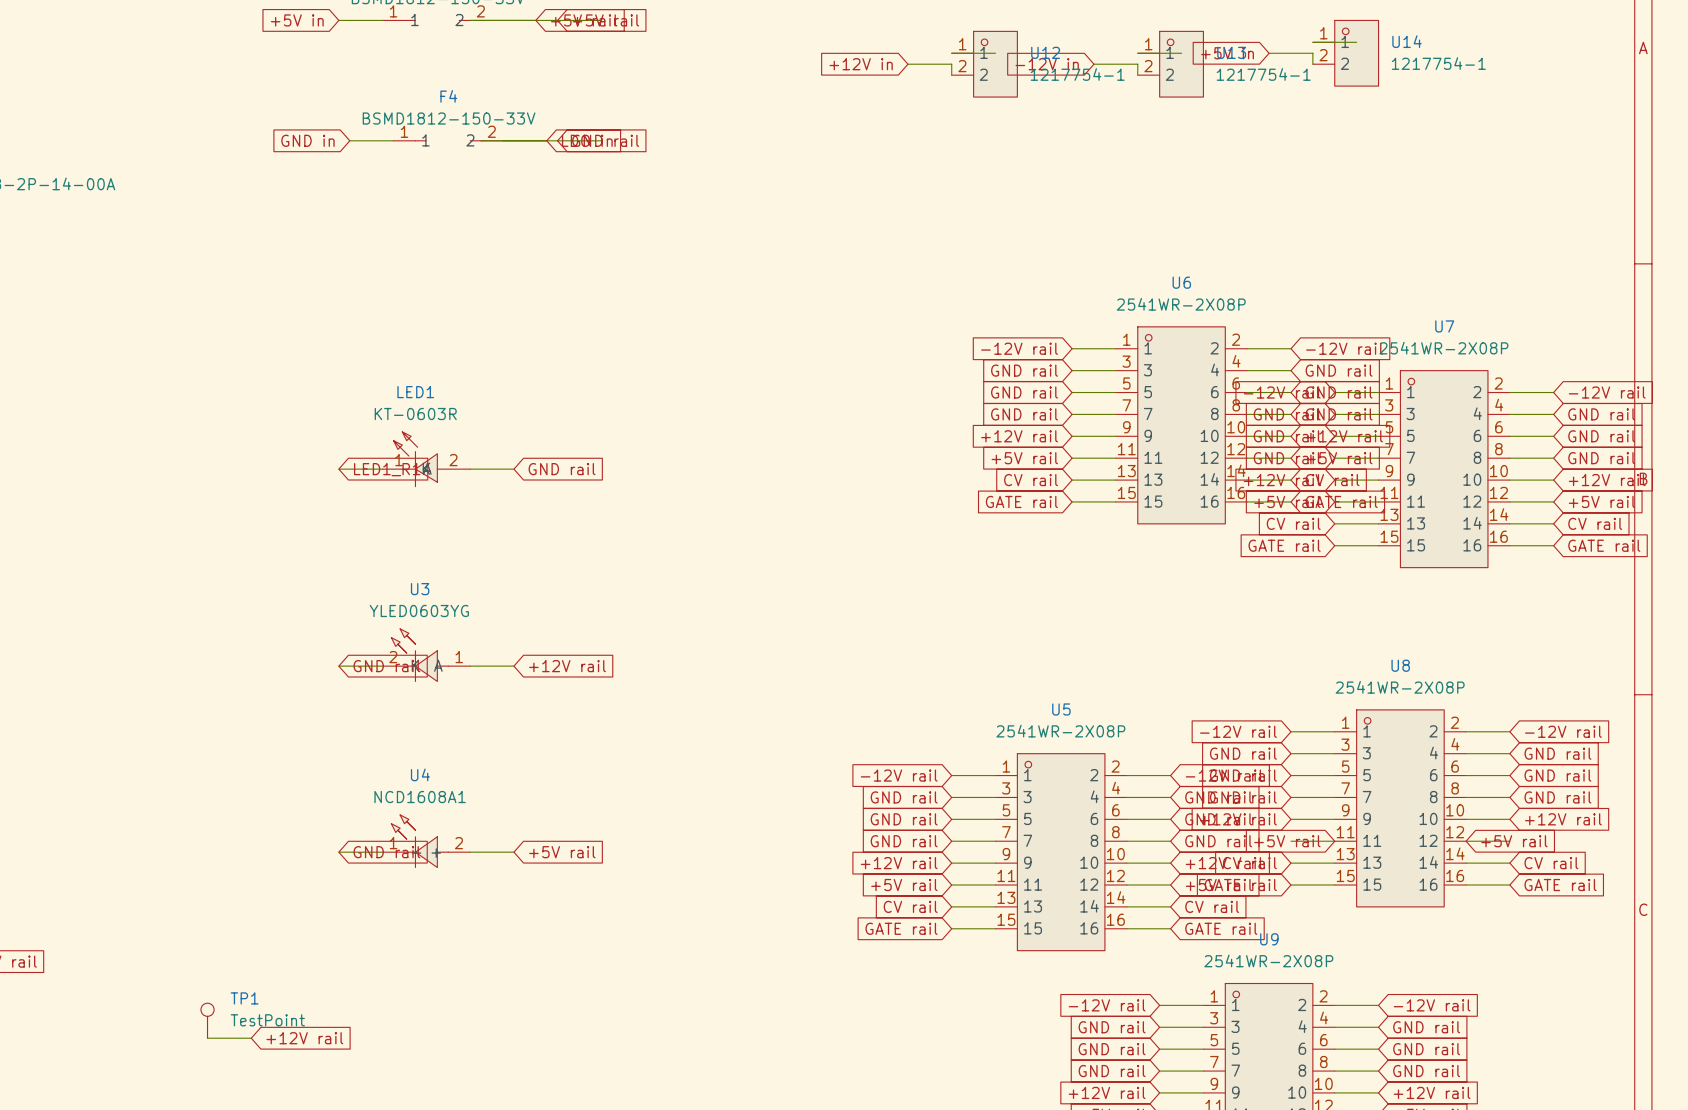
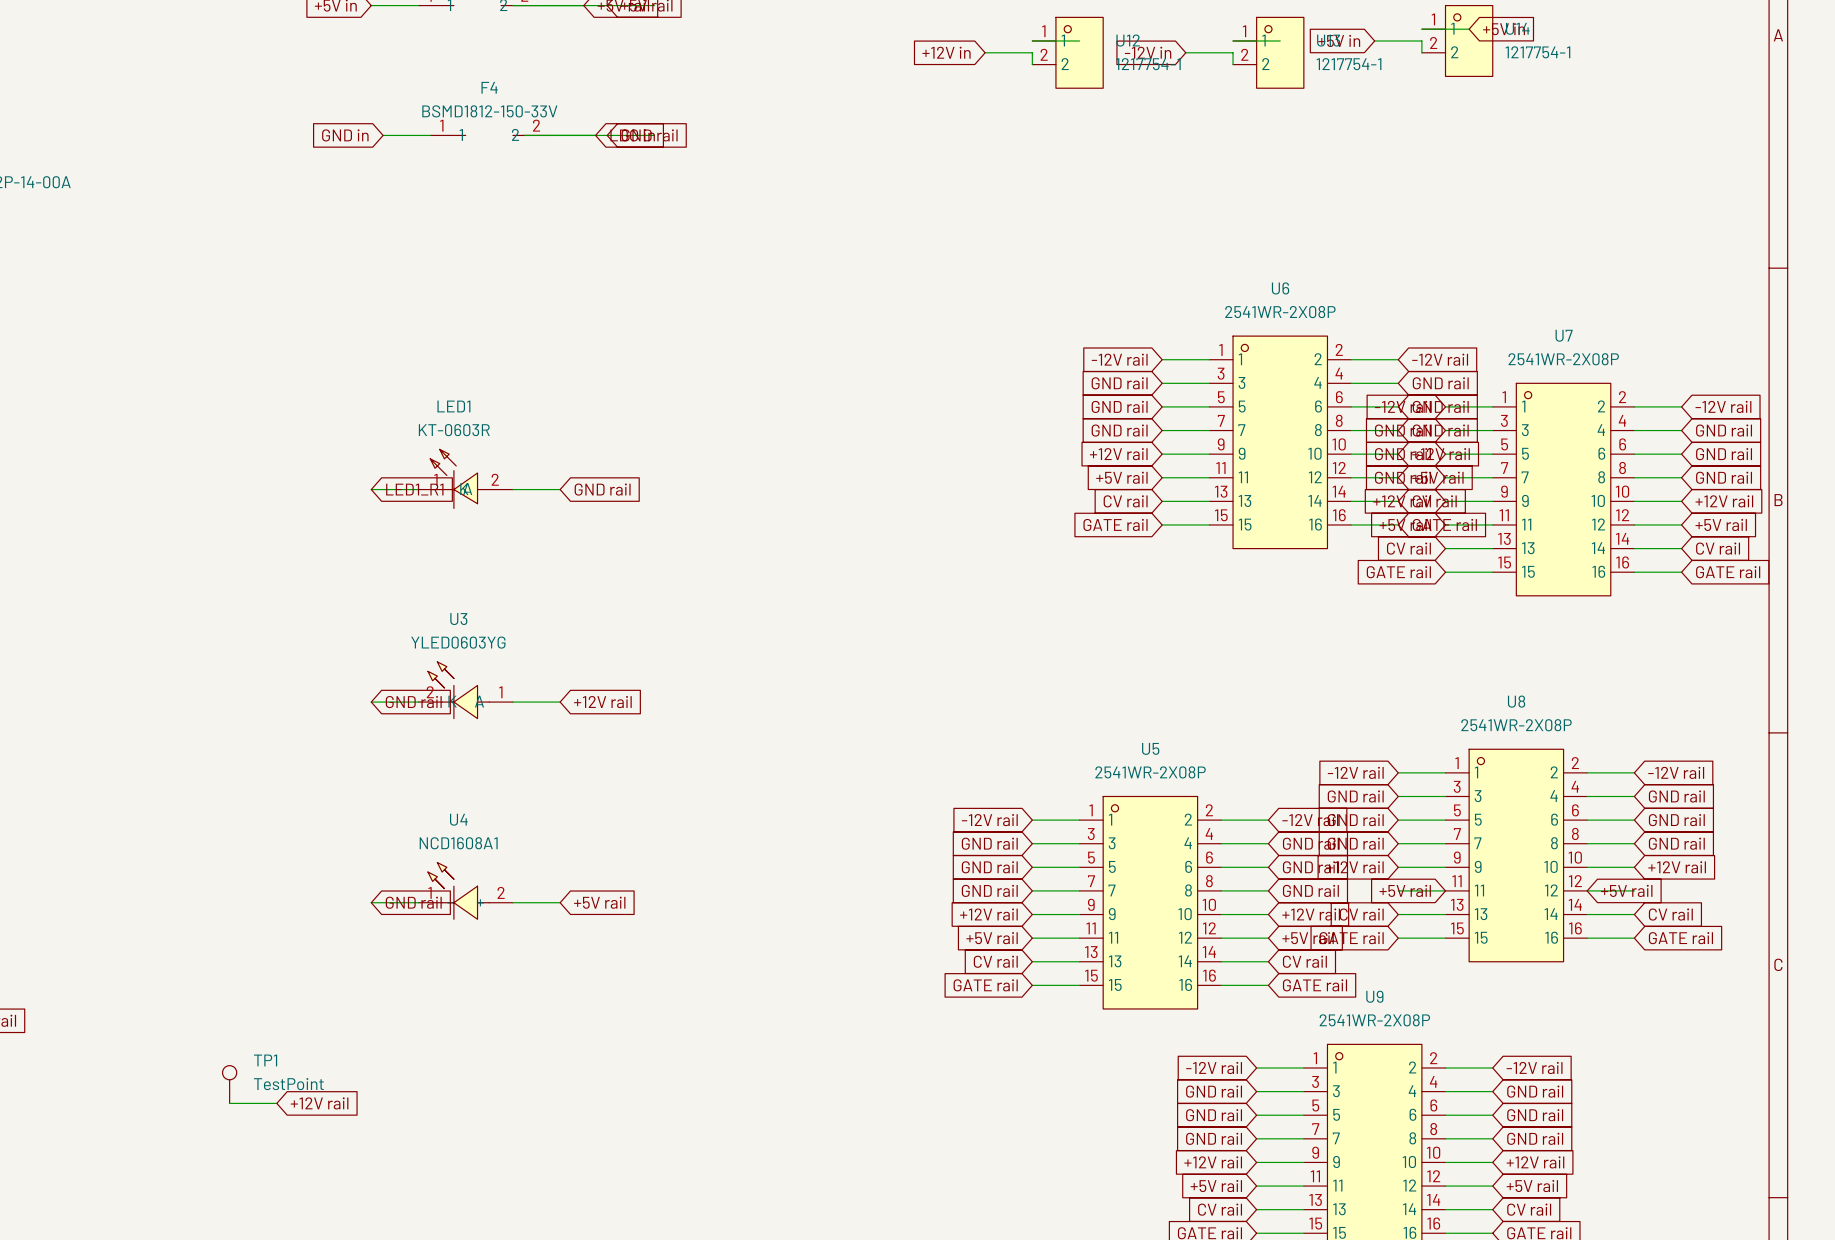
global label: none -> +5V in (1504, 29)

